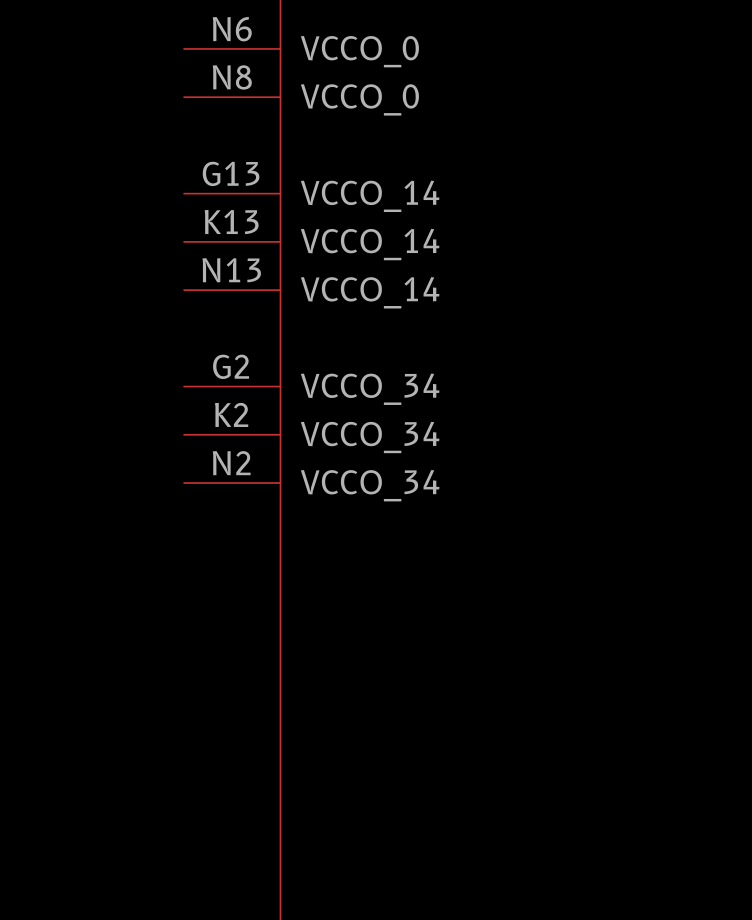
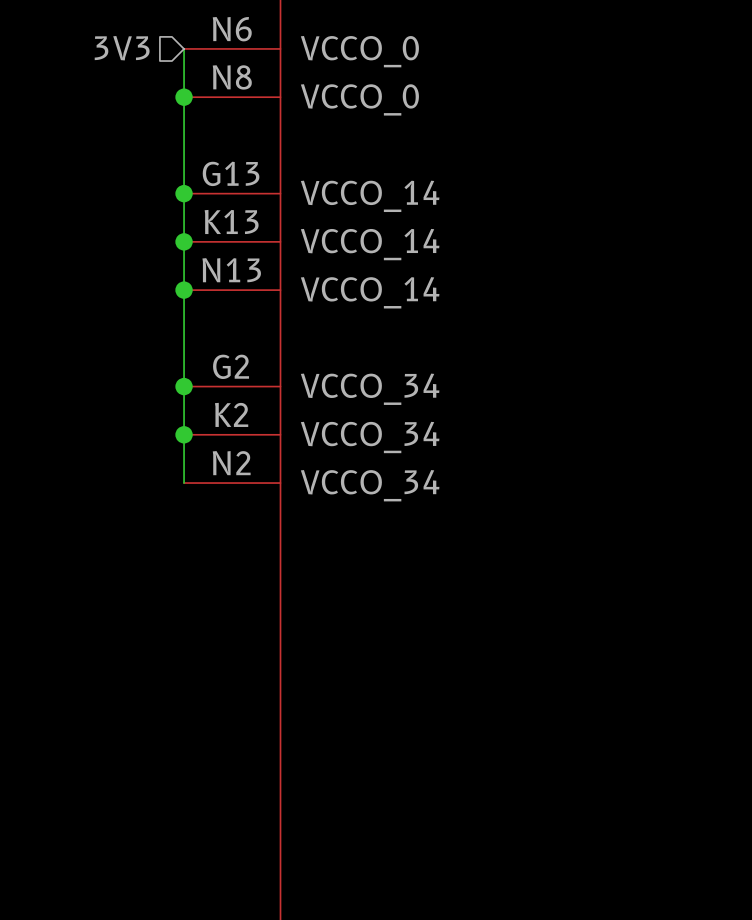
hierarchical label: none -> 3V3 (122, 48)
wire: none -> (184, 48) (184, 483)
junction: none -> (184, 97)
junction: none -> (184, 193)
junction: none -> (184, 241)
junction: none -> (184, 290)
junction: none -> (184, 386)
junction: none -> (184, 434)

